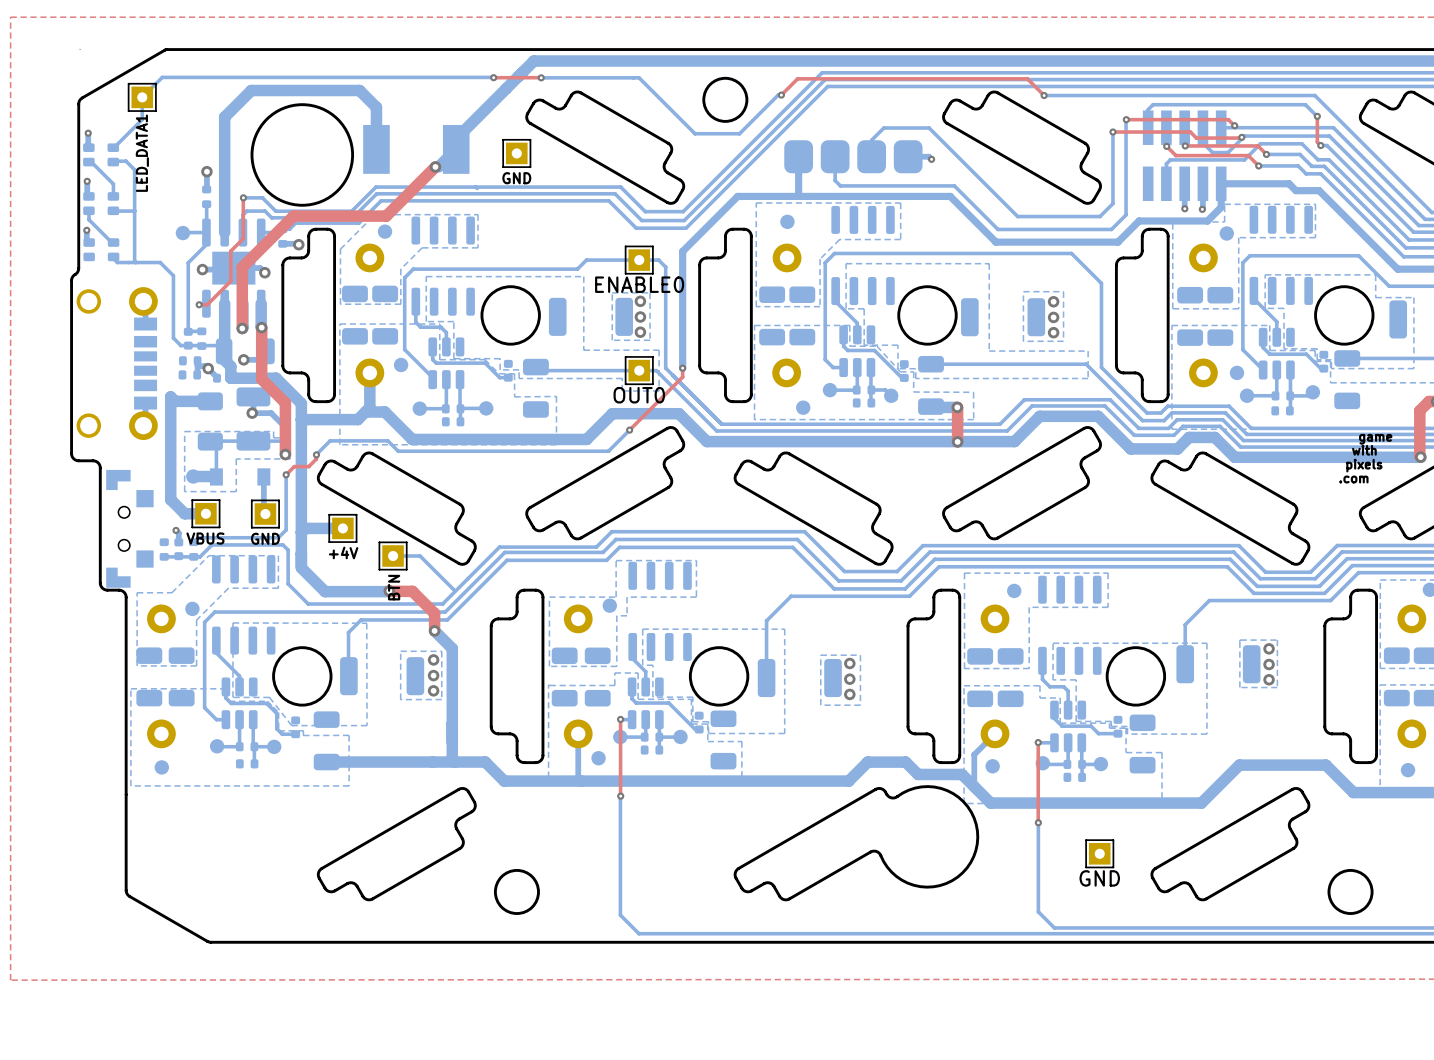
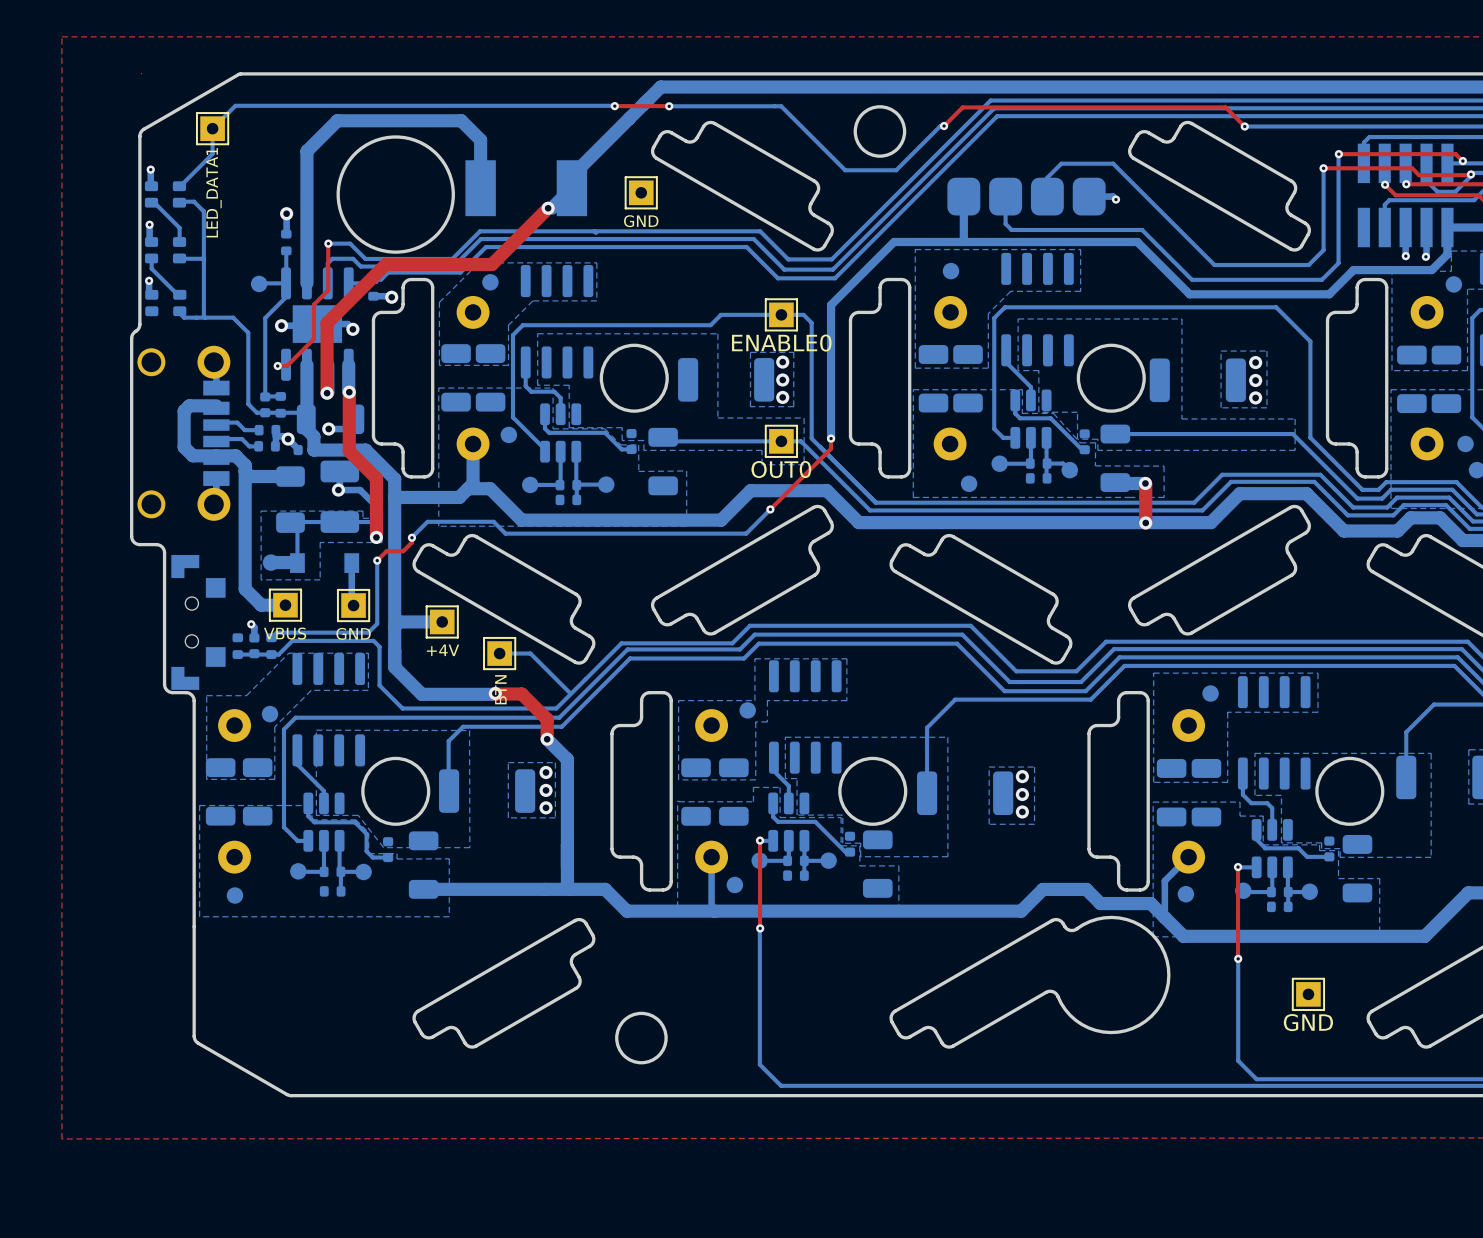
bottom track: none -> (216, 405) (189, 405) (184, 411) (184, 447) (192, 455) (235, 455) (245, 465) (245, 471)
bottom track: none -> (216, 422) (237, 422) (244, 430) (259, 430)
bottom track: none -> (216, 439) (242, 439) (249, 446) (258, 446)

